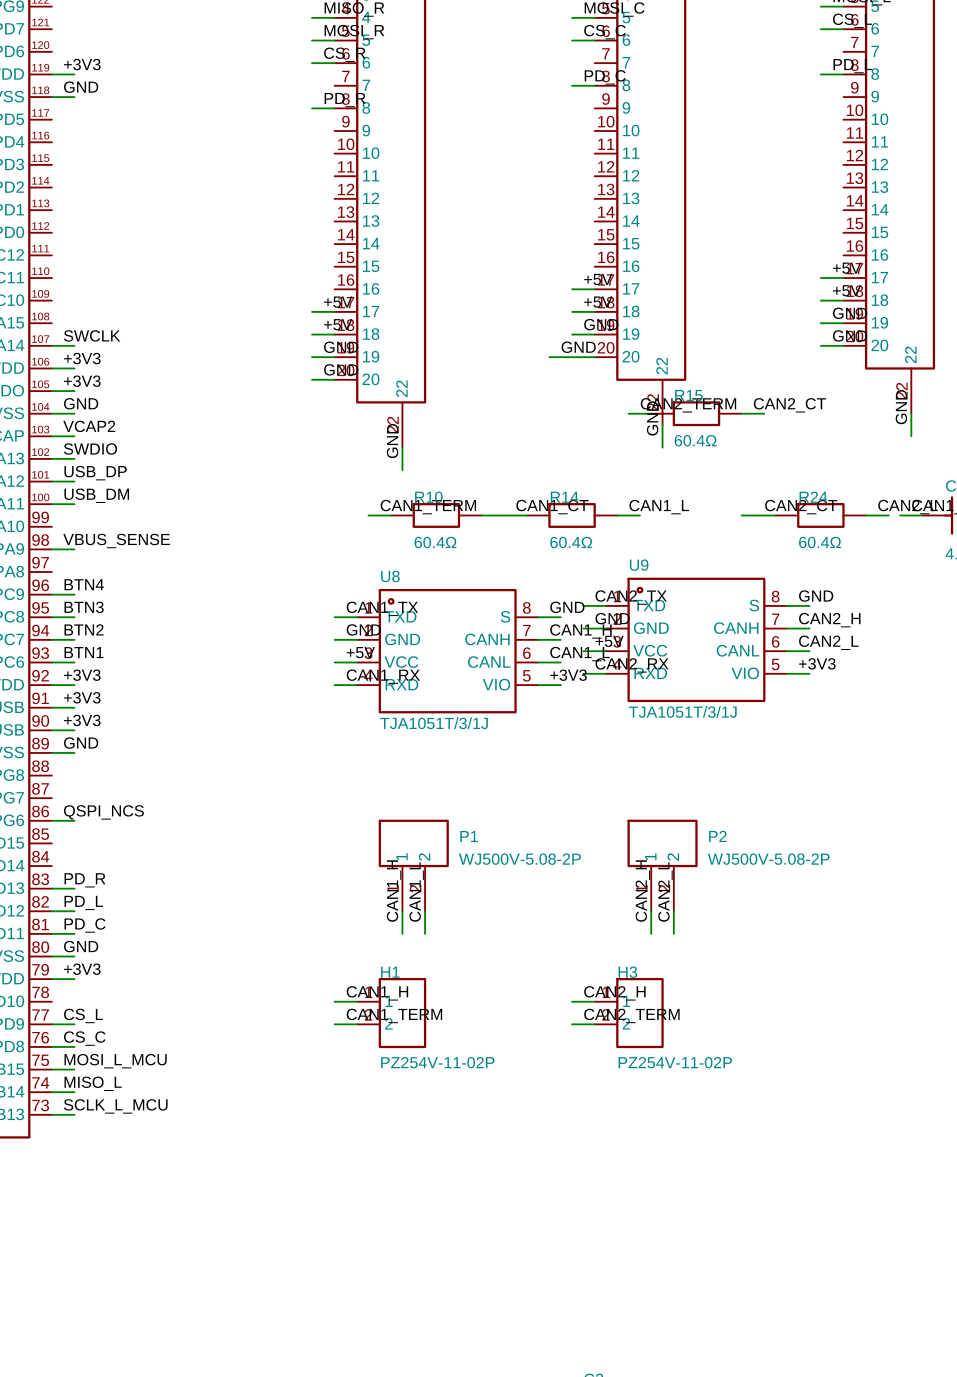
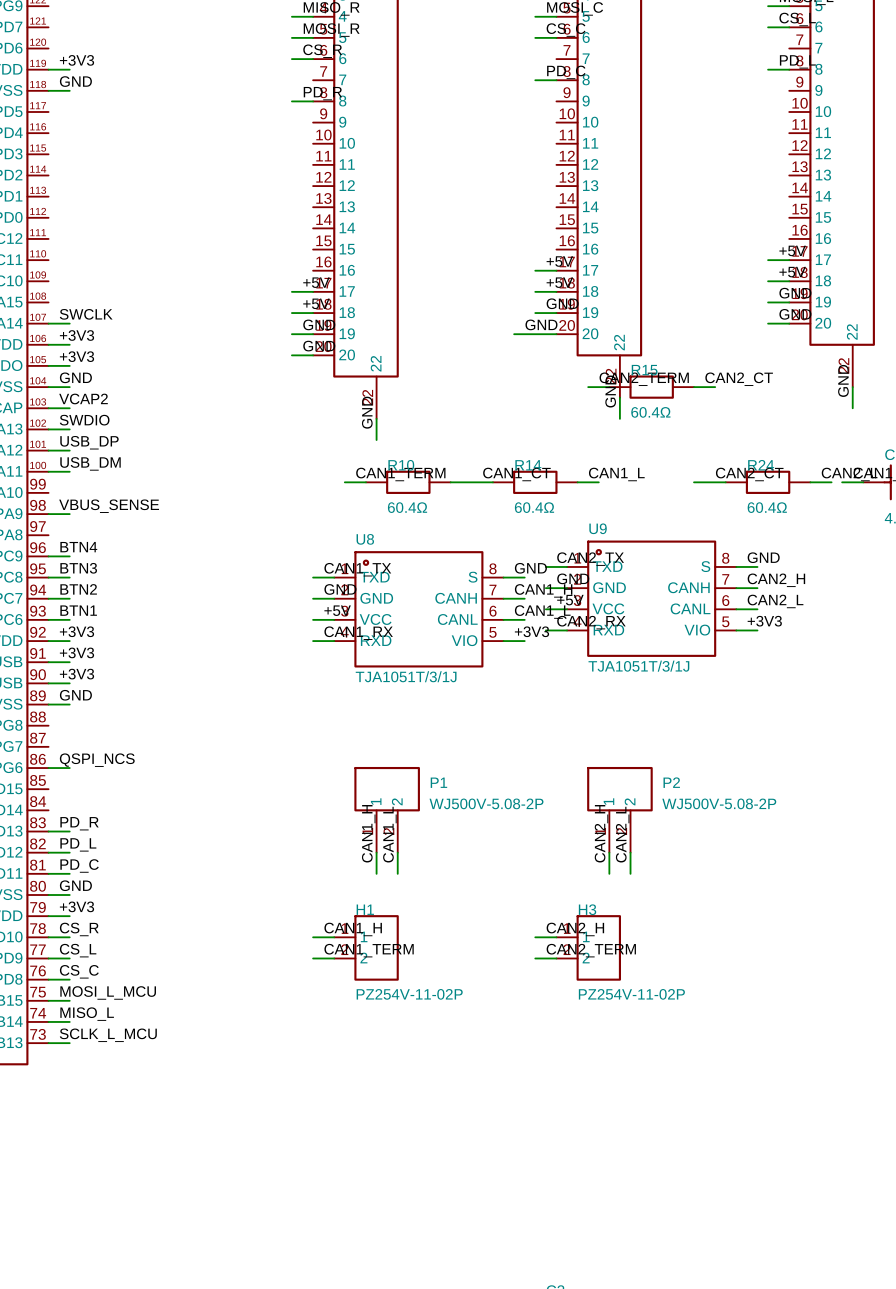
label: none -> CS_R (79, 929)
wire: none -> (48, 937) (69, 937)

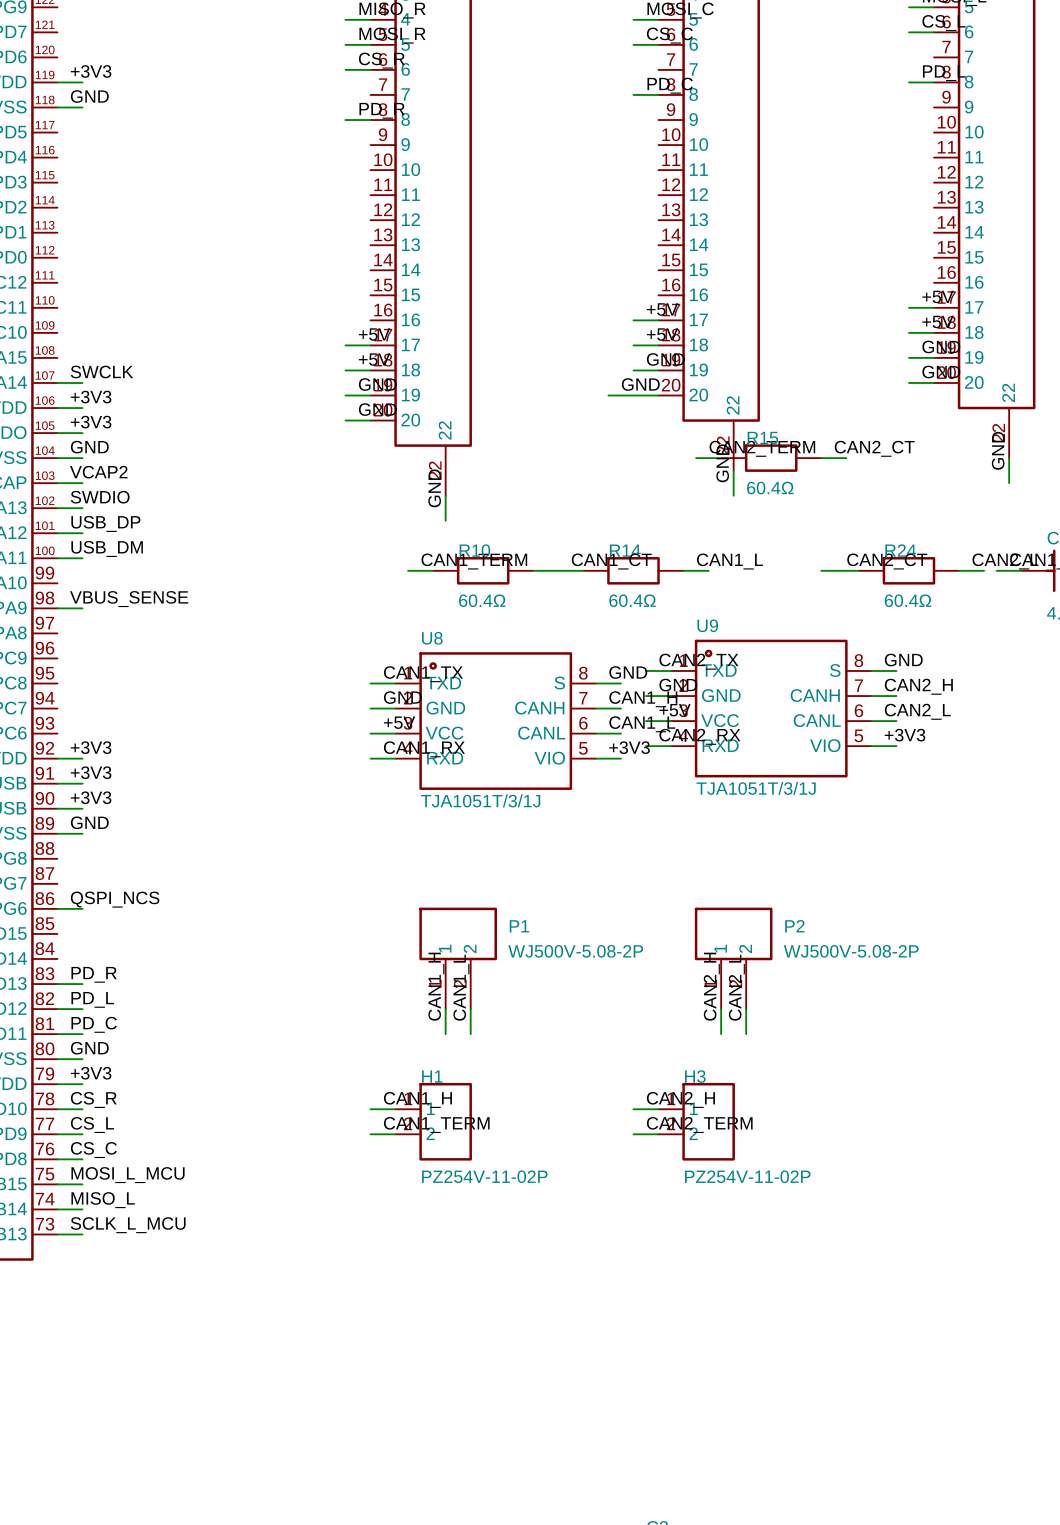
label: BTN4 (78, 547) -> none
wire: (48, 556) (69, 556) -> none
label: BTN3 (78, 568) -> none
wire: (48, 577) (69, 577) -> none
label: BTN2 (78, 589) -> none
wire: (48, 598) (69, 598) -> none
label: BTN1 (78, 610) -> none
wire: (48, 619) (69, 619) -> none

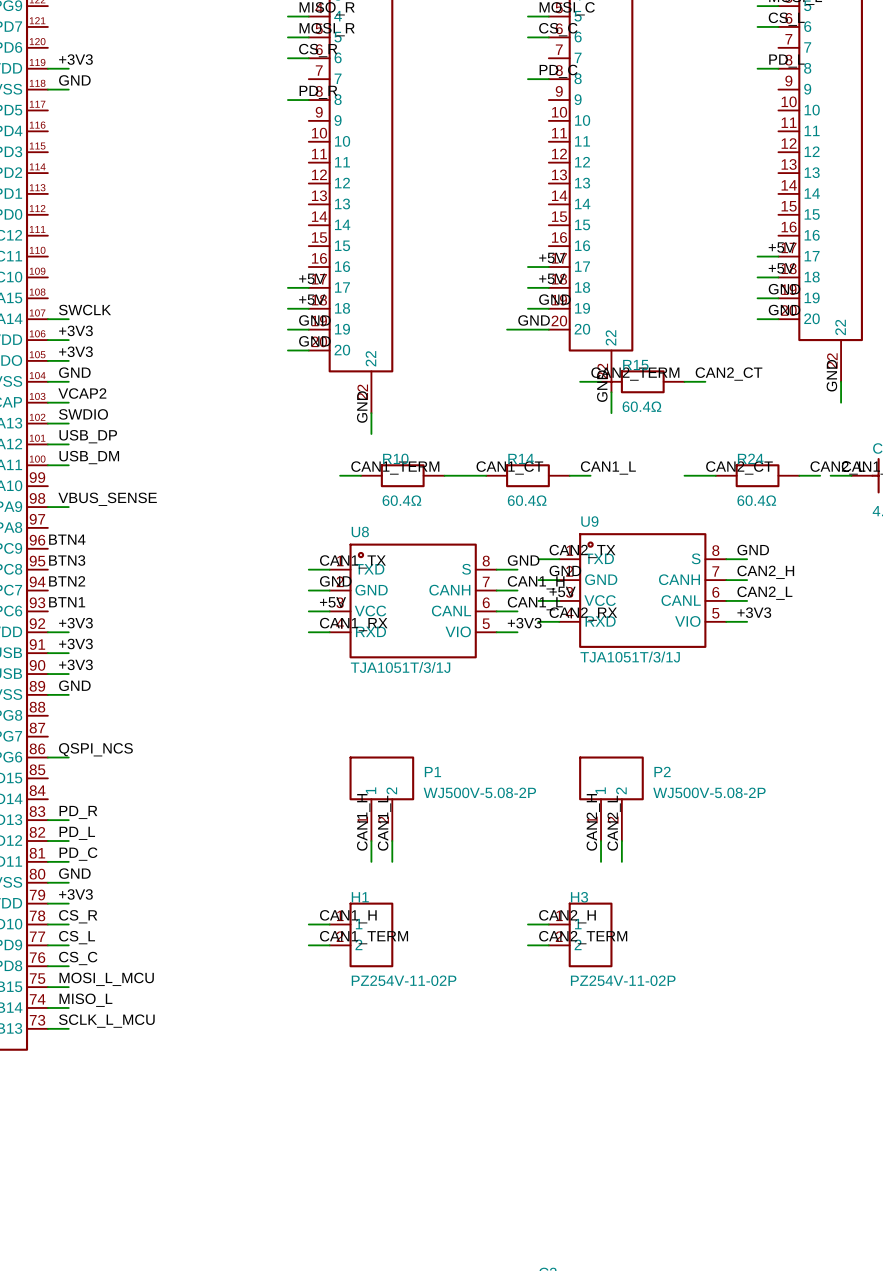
label: none -> BTN4 (67, 539)
label: none -> BTN3 (67, 560)
label: none -> BTN2 (67, 581)
label: none -> BTN1 (67, 602)

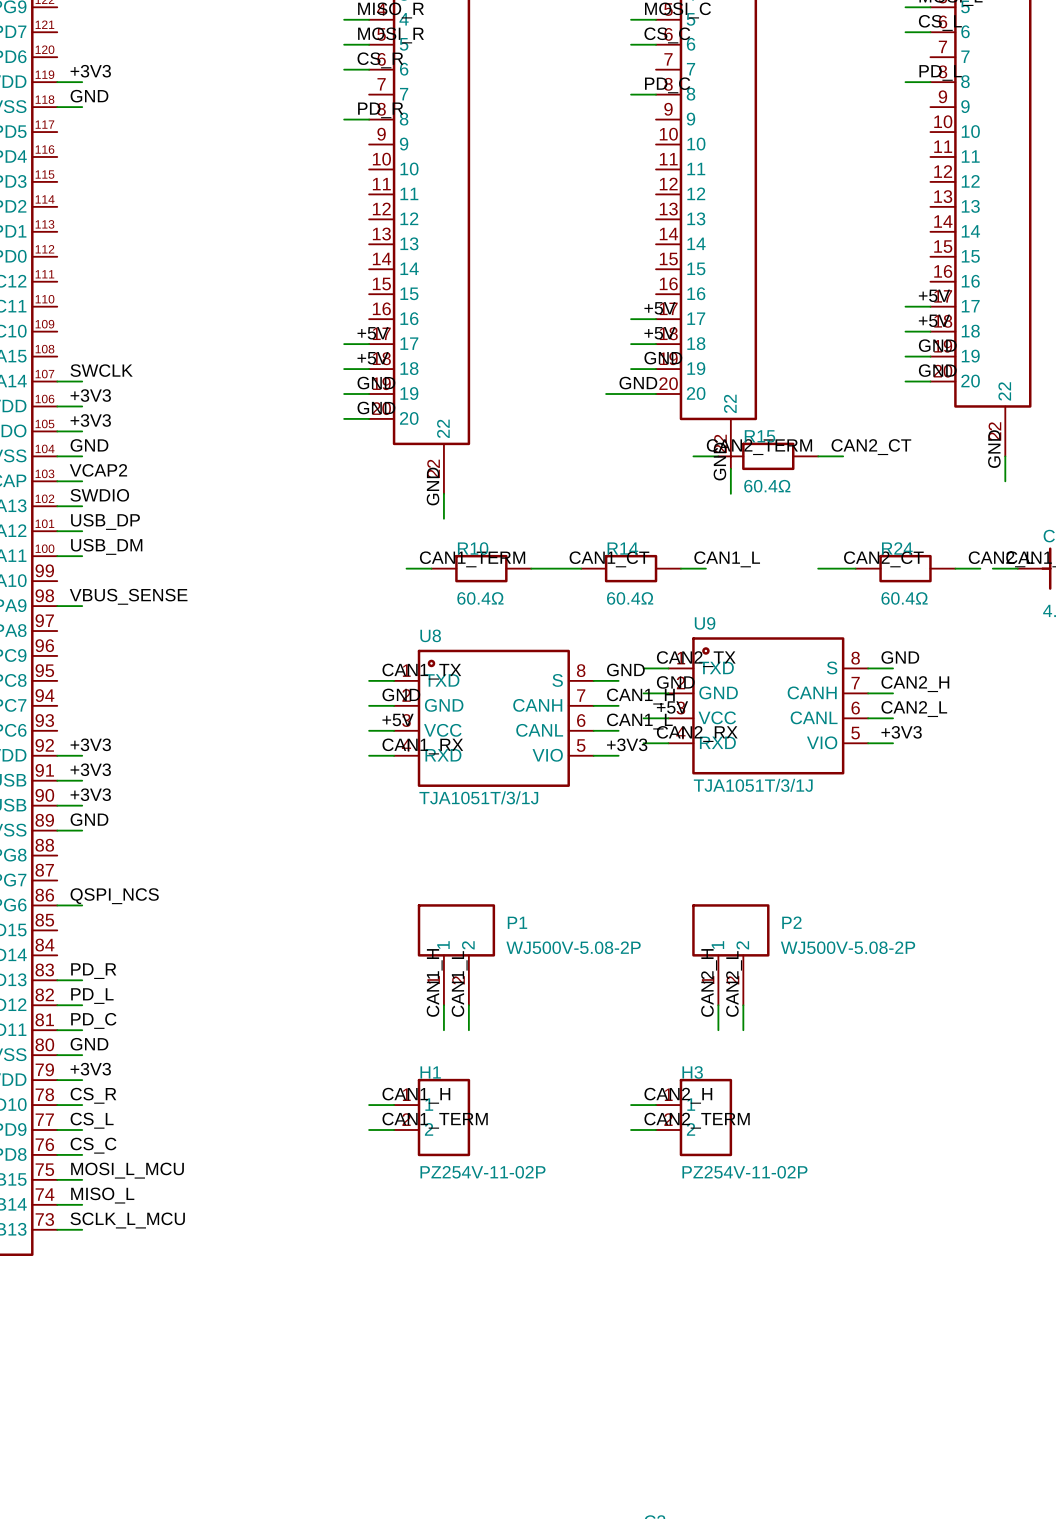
label: BTN4 (67, 539) -> none
label: BTN3 (67, 560) -> none
label: BTN2 (67, 581) -> none
label: BTN1 (67, 602) -> none

